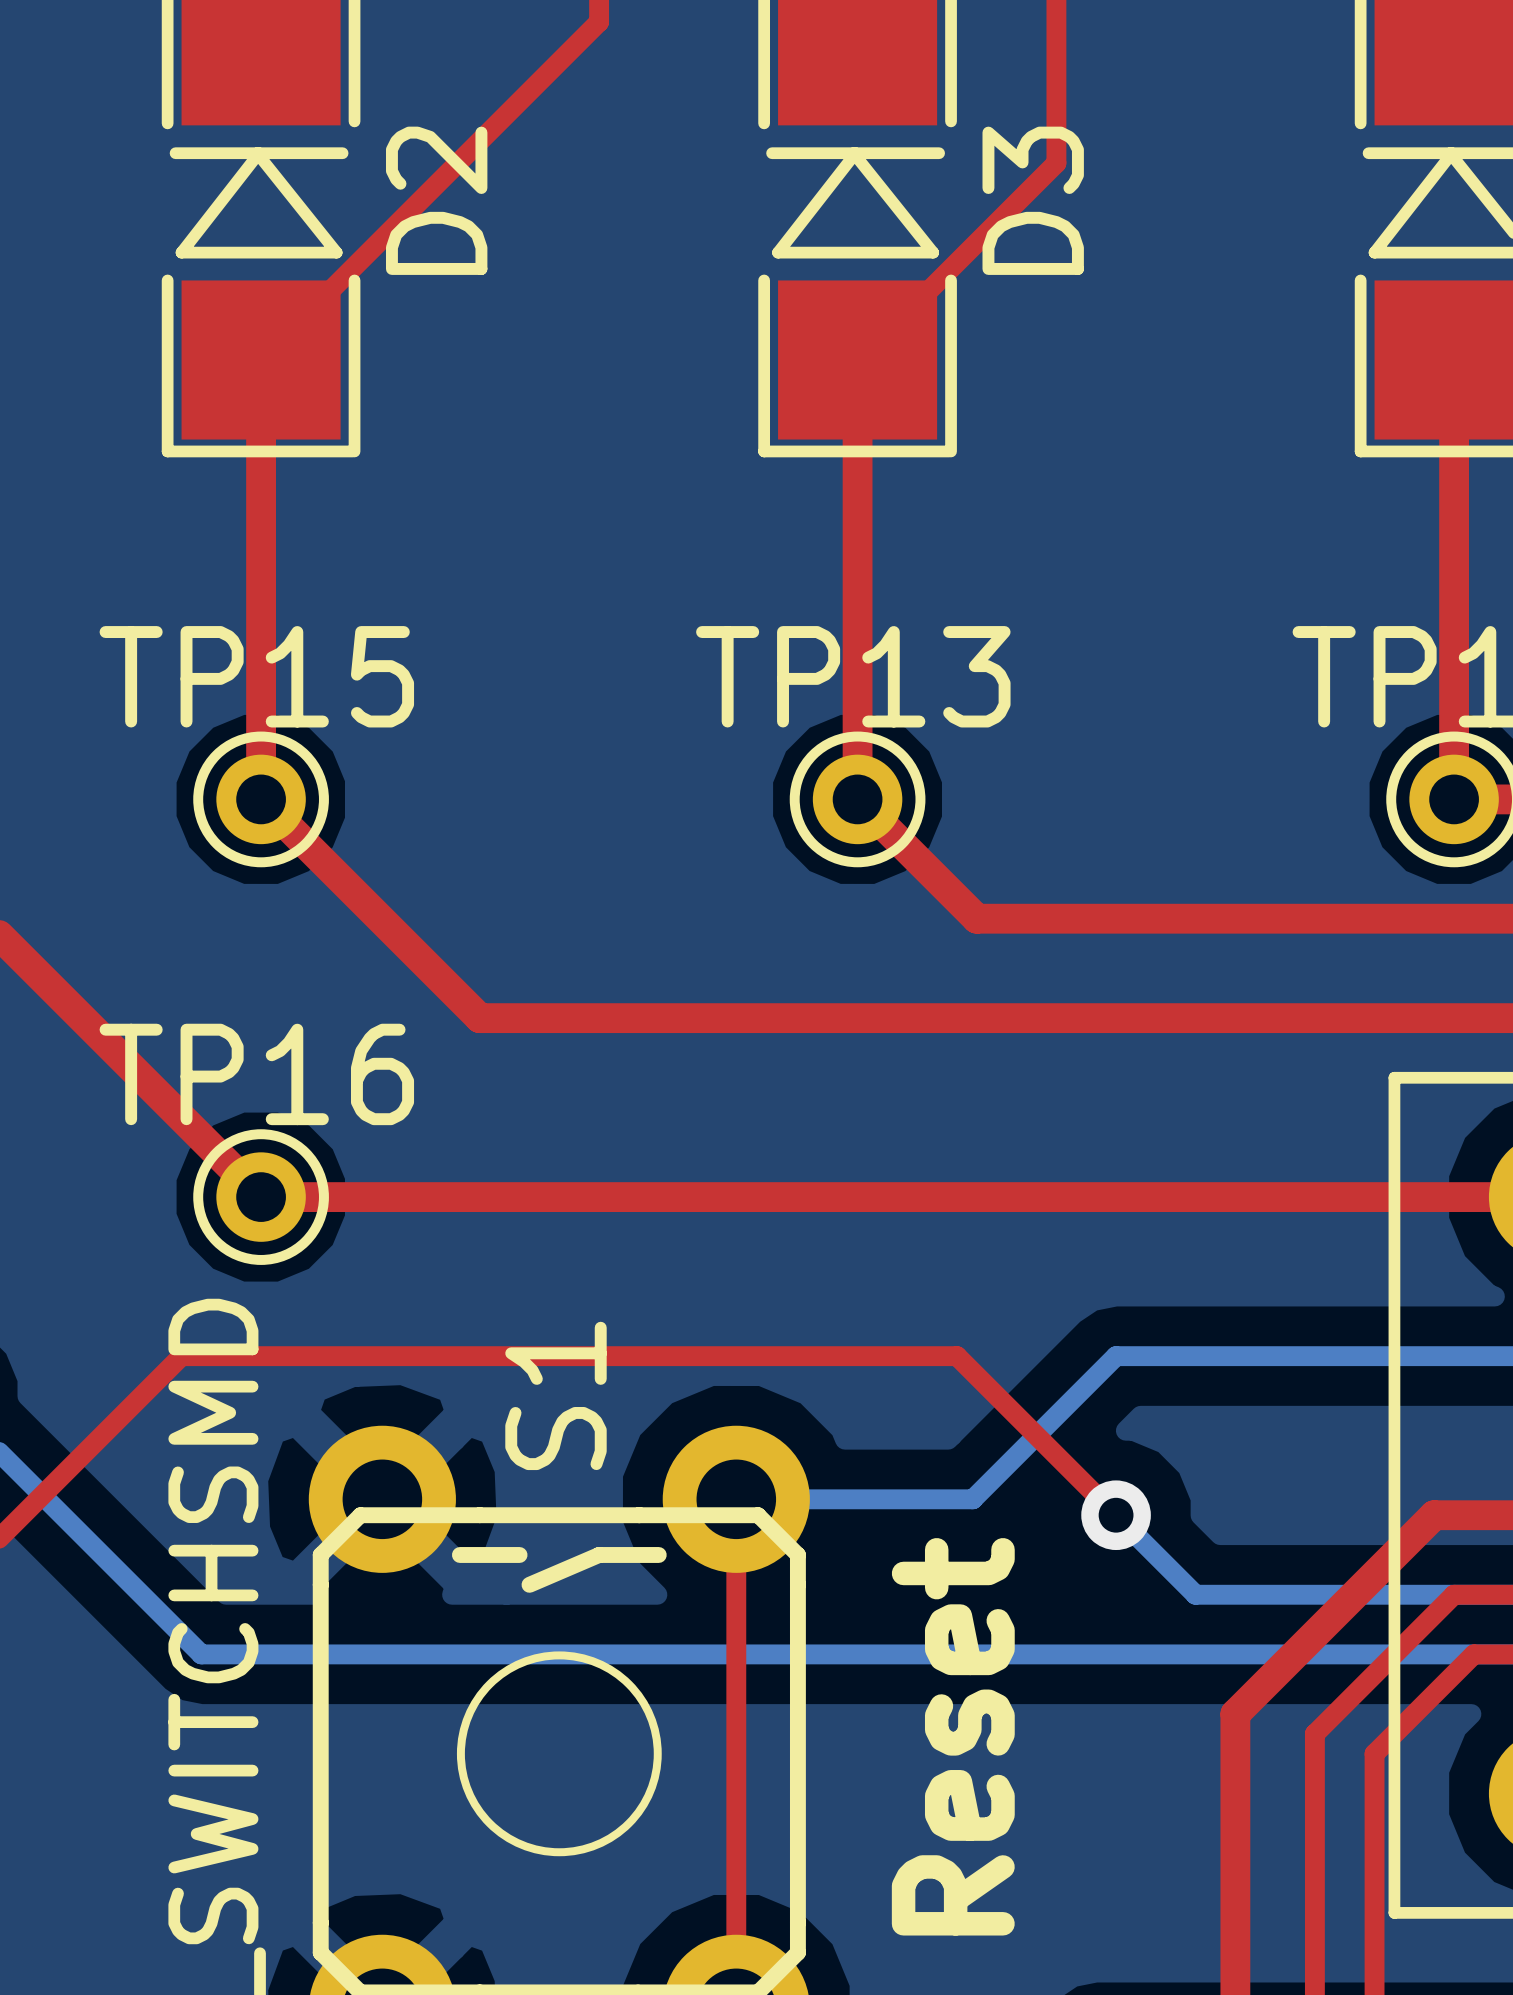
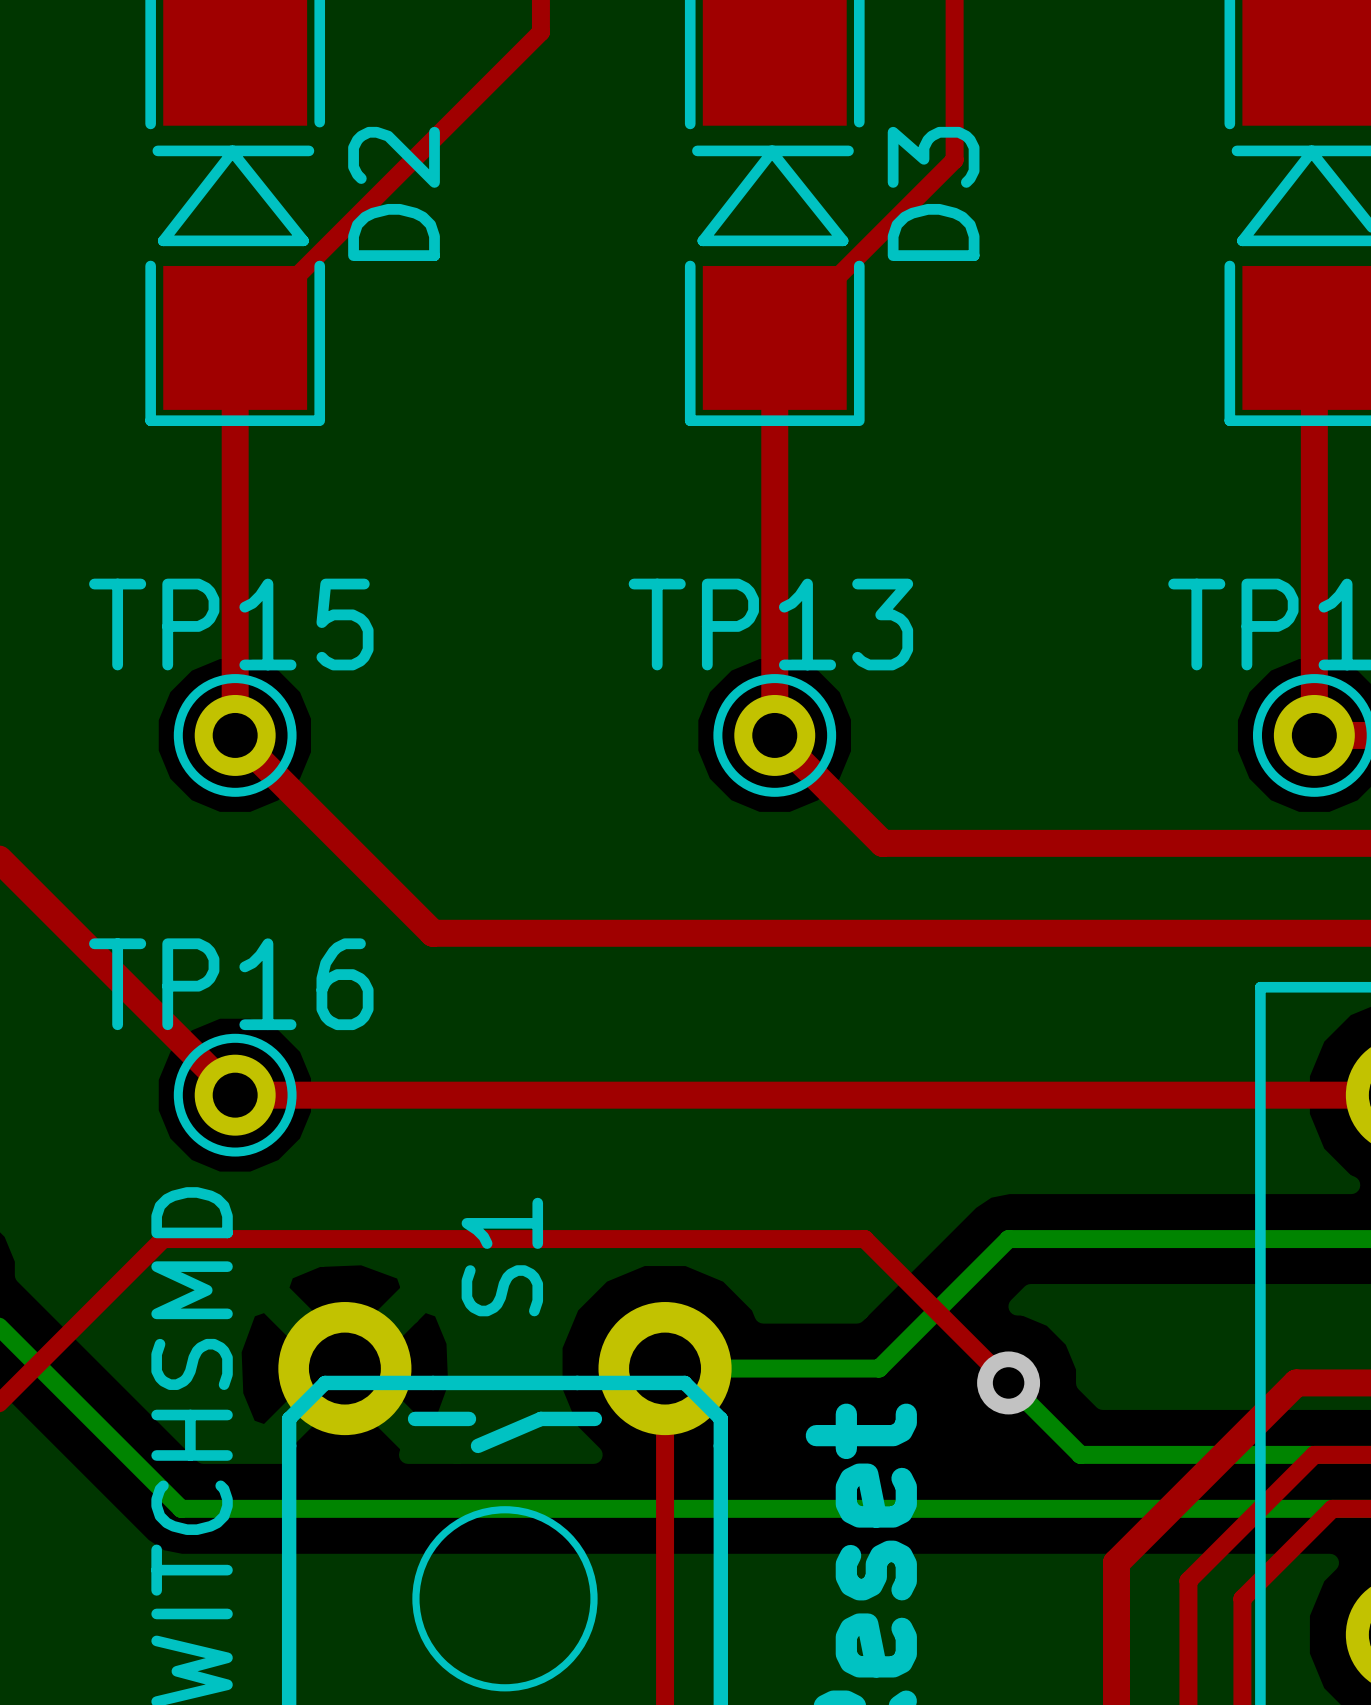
S1 name position: S1 (555, 1395) -> S1 (502, 1257)

